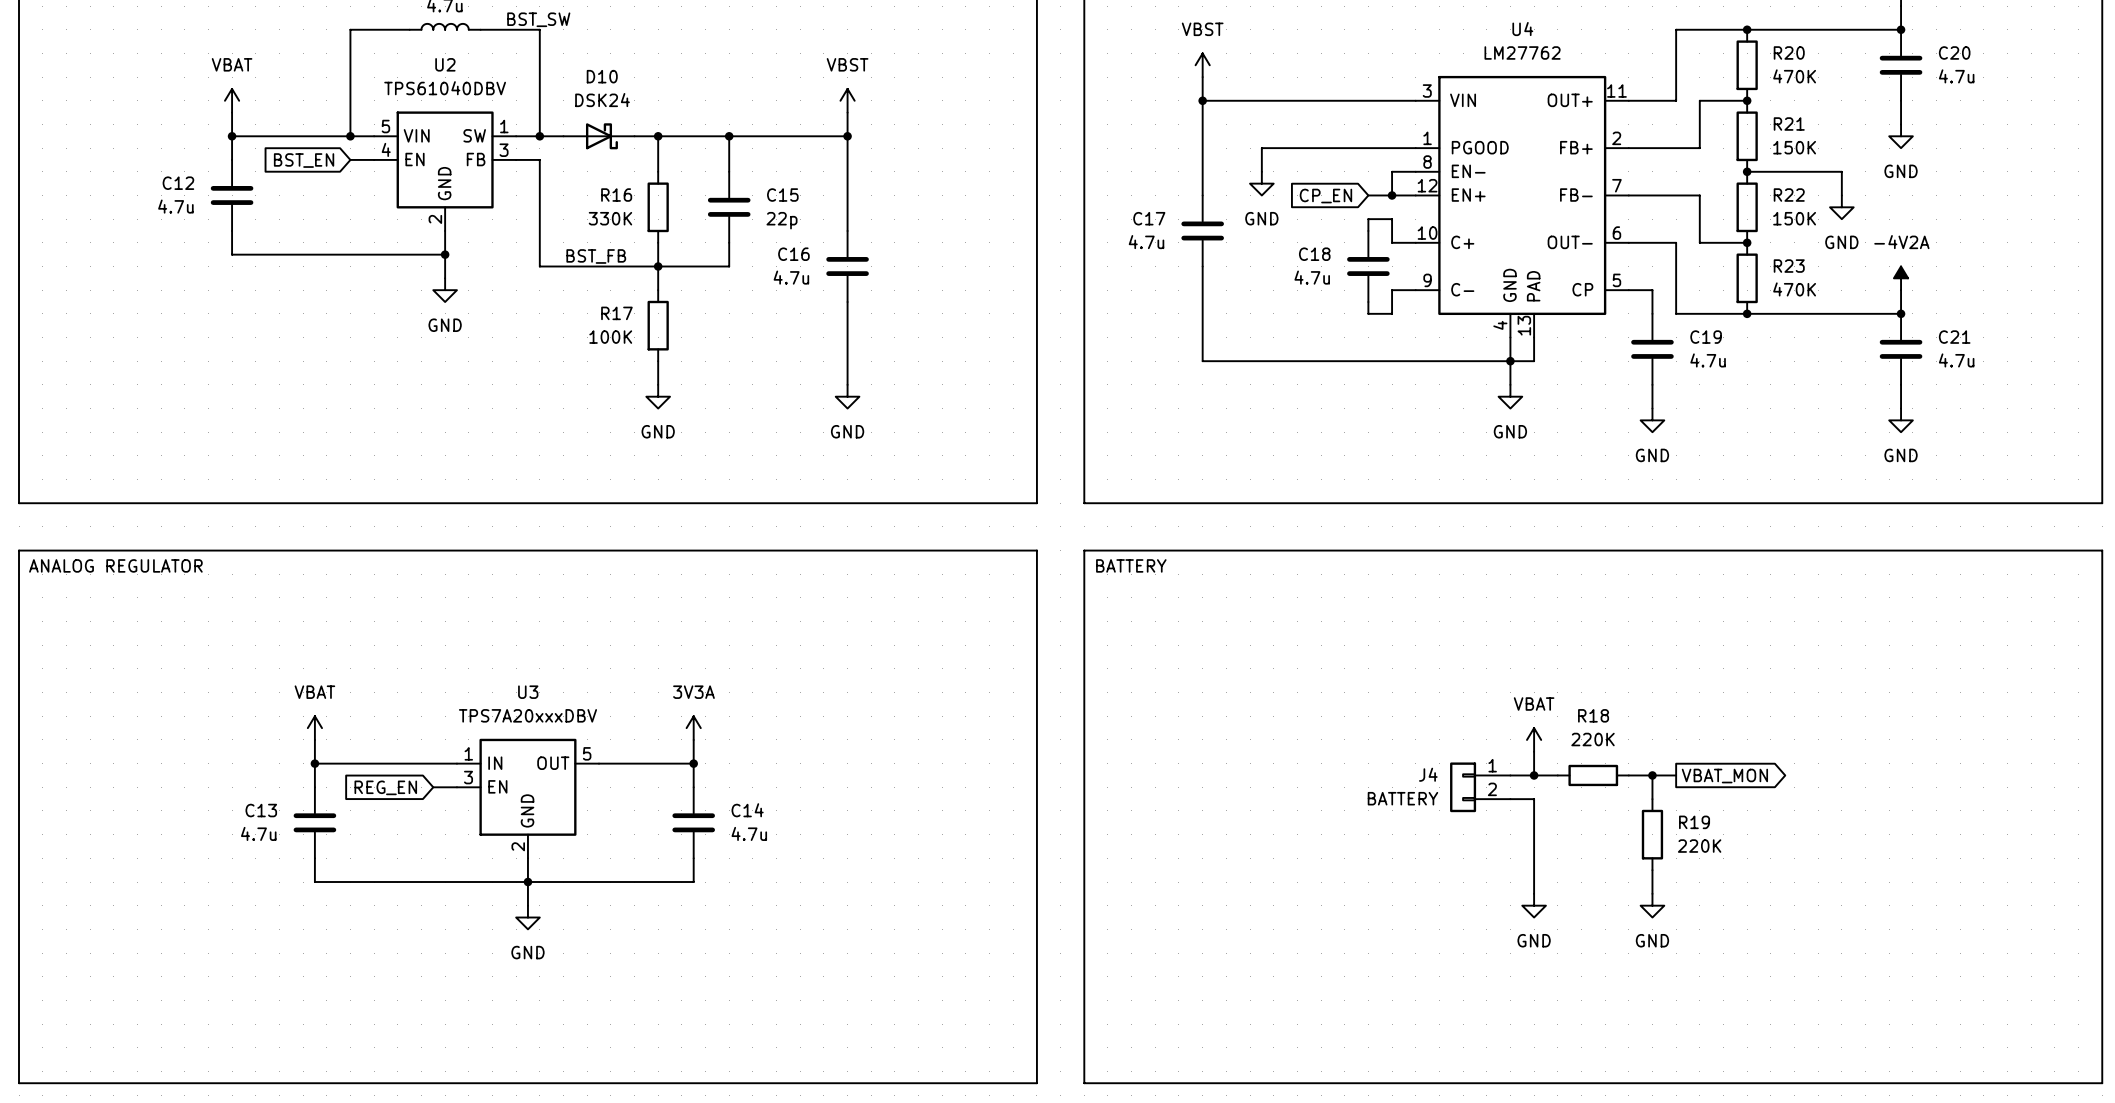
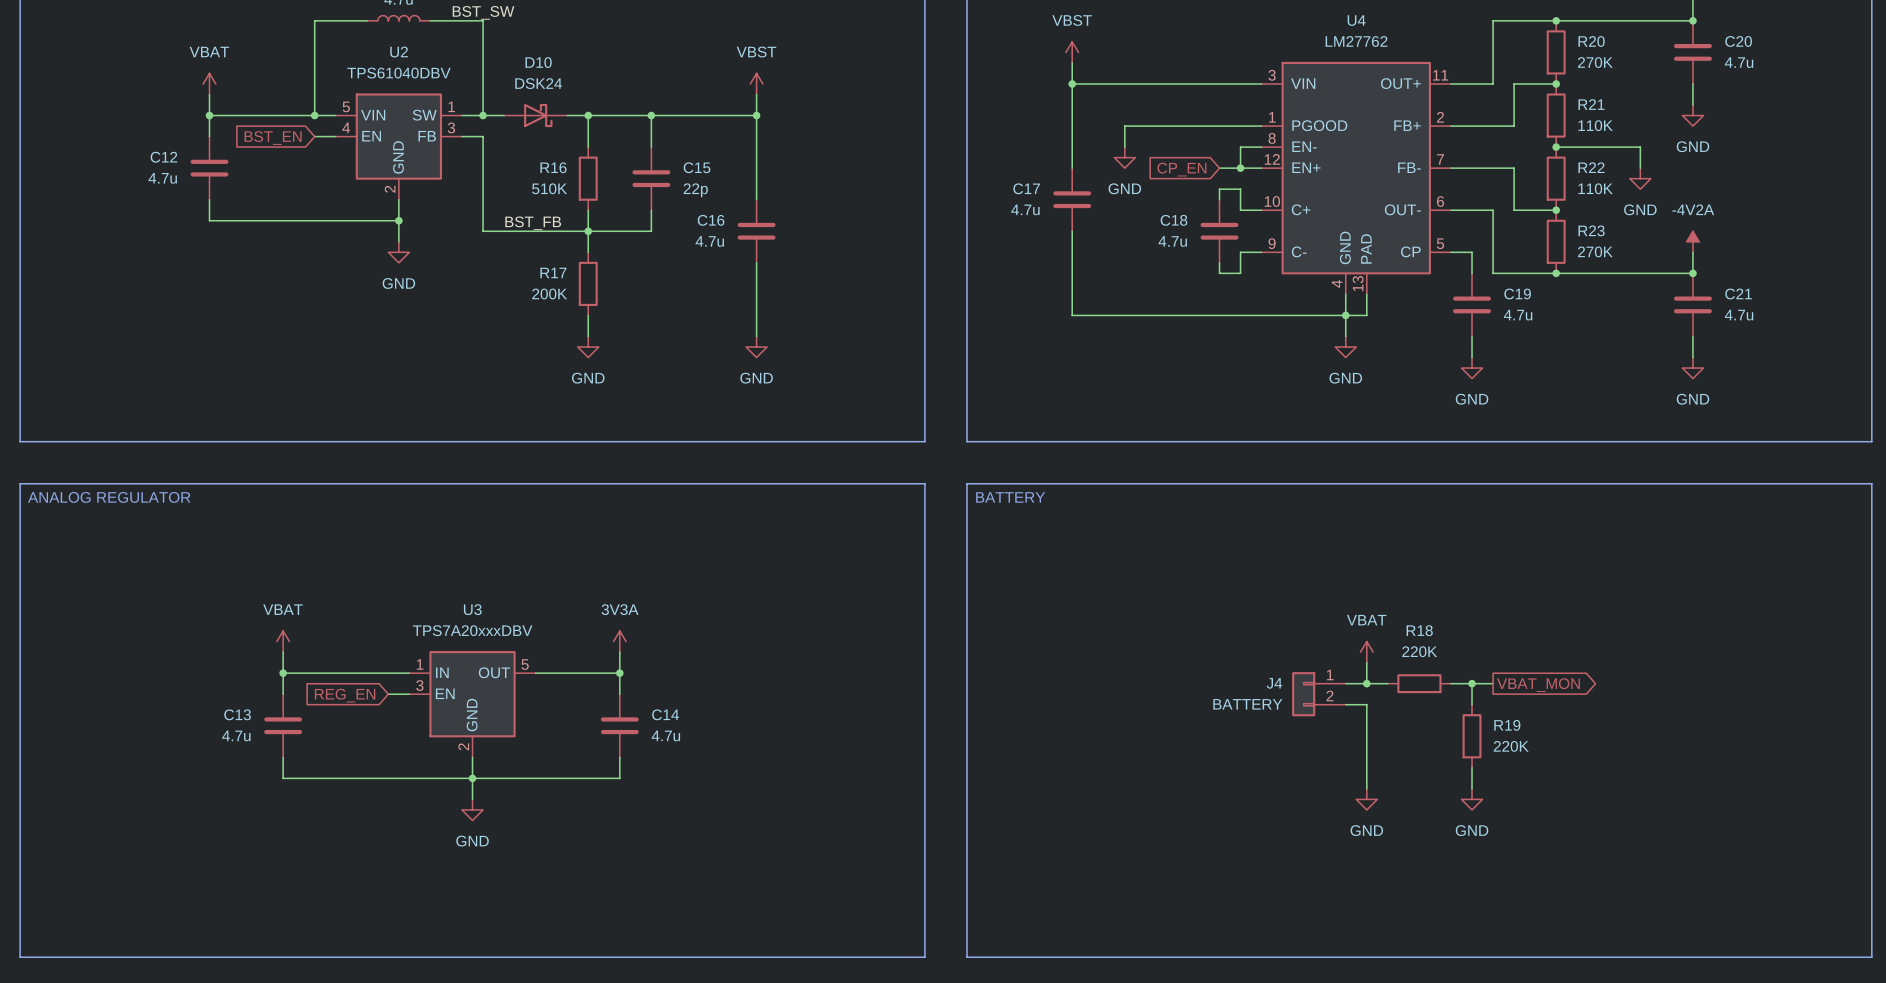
R20 value: 470K (1794, 76) -> 270K (1595, 62)
R21 value: 150K (1794, 147) -> 110K (1595, 125)
R16 value: 330K (610, 218) -> 510K (549, 188)
R22 value: 150K (1794, 218) -> 110K (1595, 188)
R23 value: 470K (1794, 289) -> 270K (1595, 251)
R17 value: 100K (610, 337) -> 200K (549, 294)

